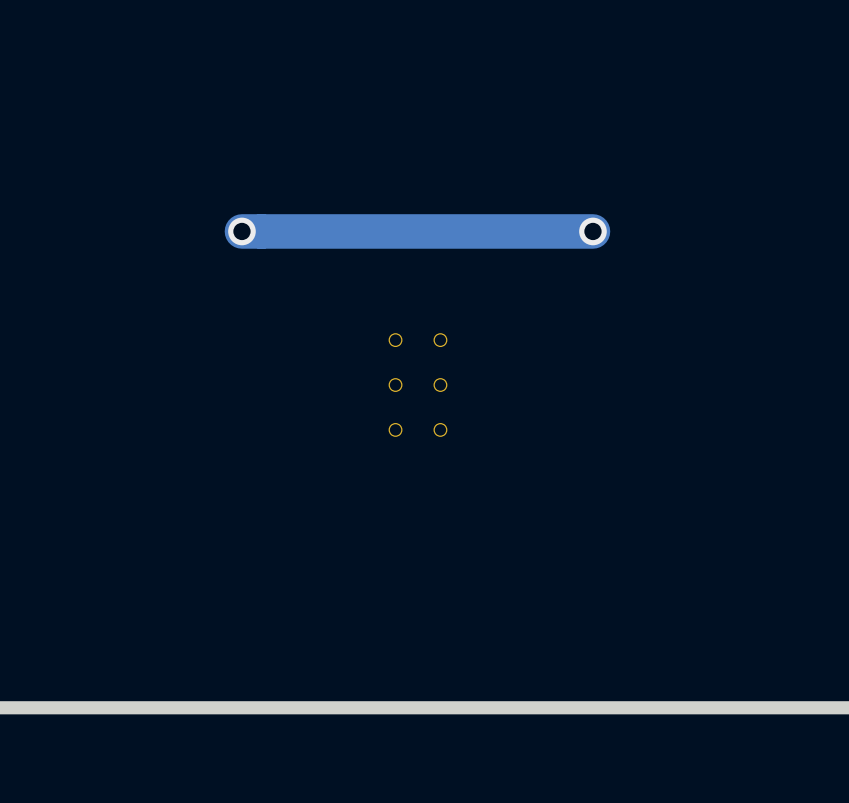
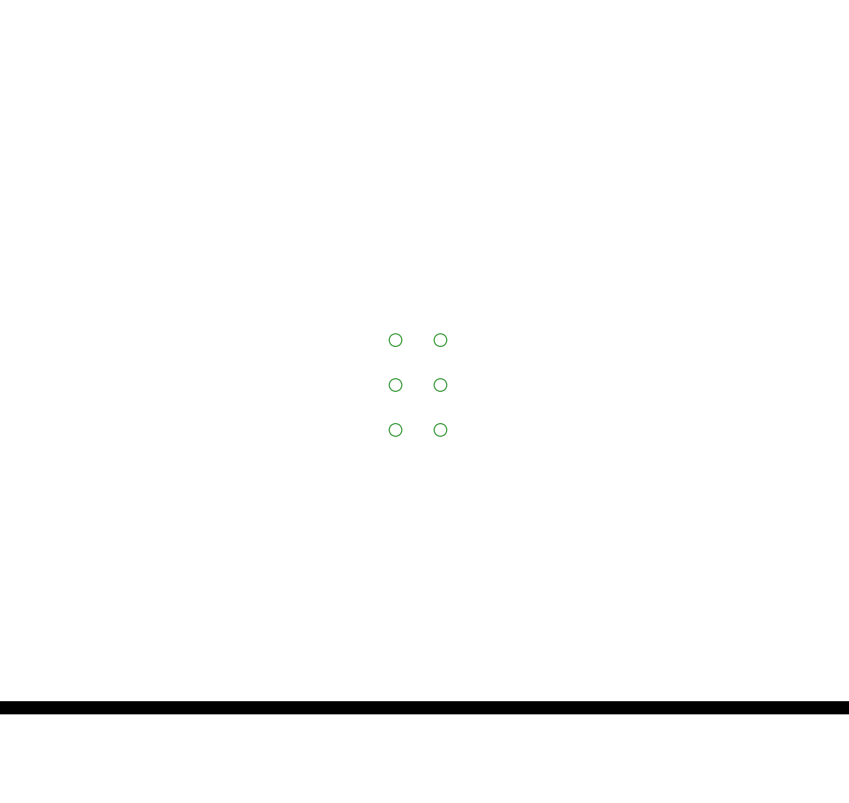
via: (241, 231) -> none
track: (592, 231) (241, 231) -> none
via: (592, 231) -> none

